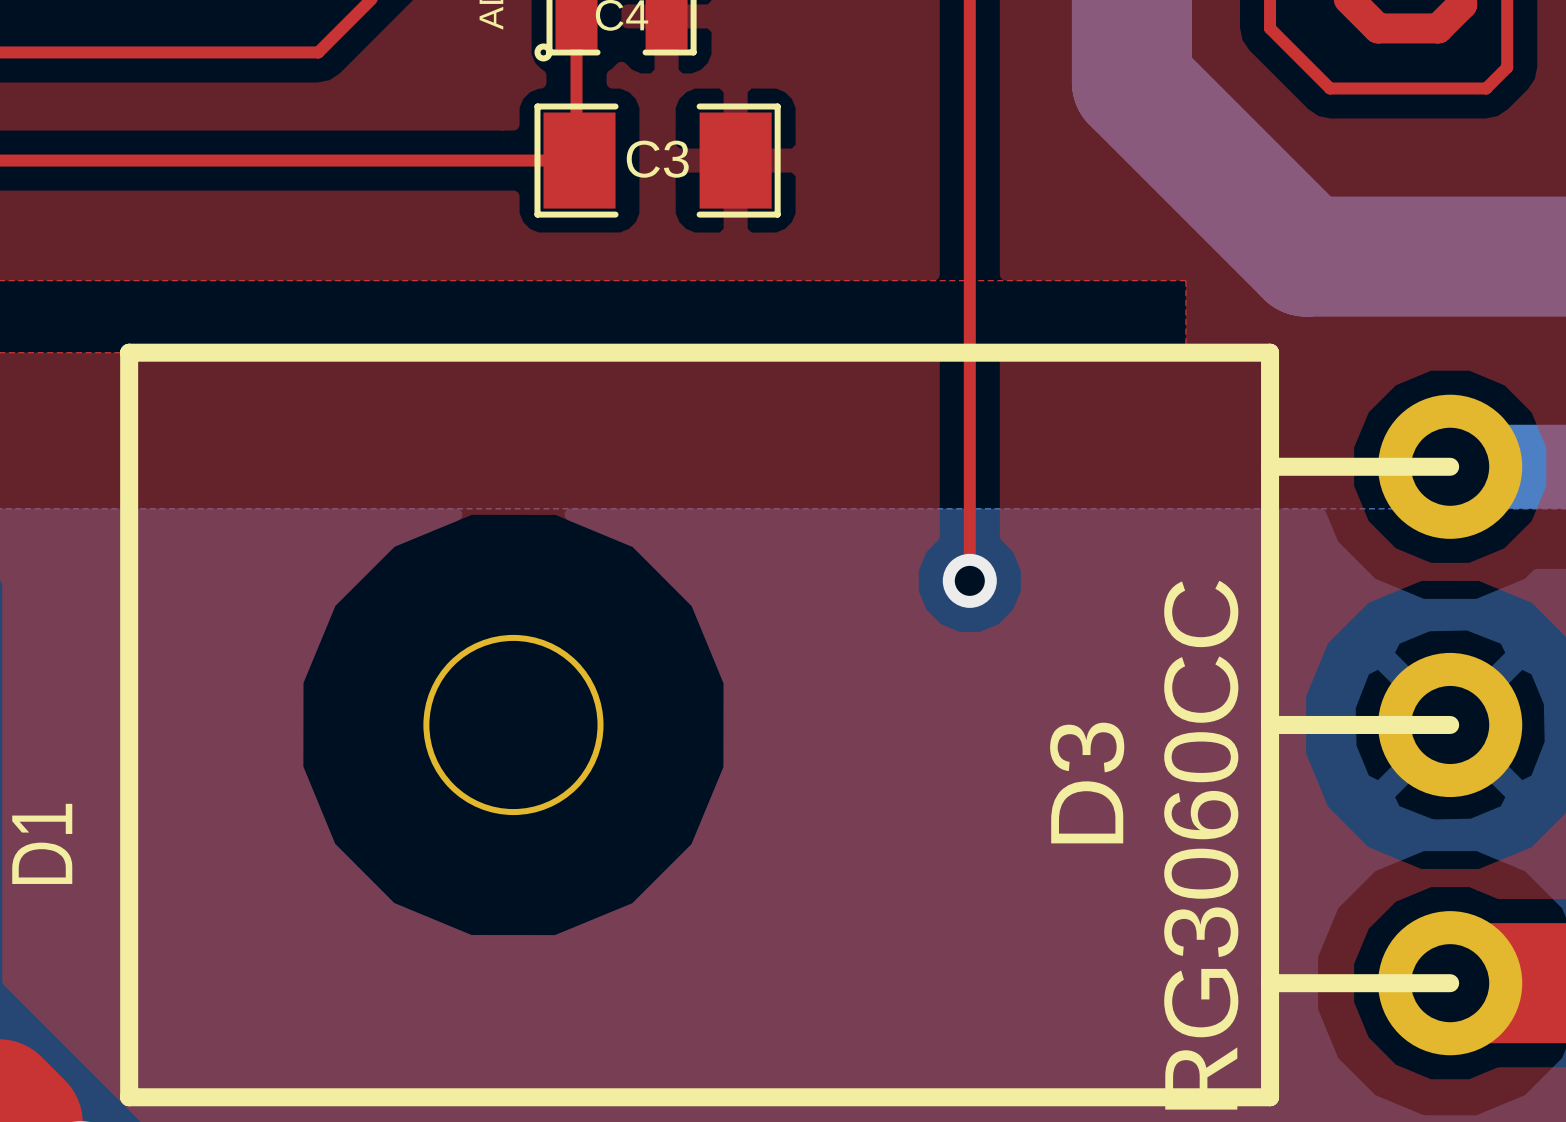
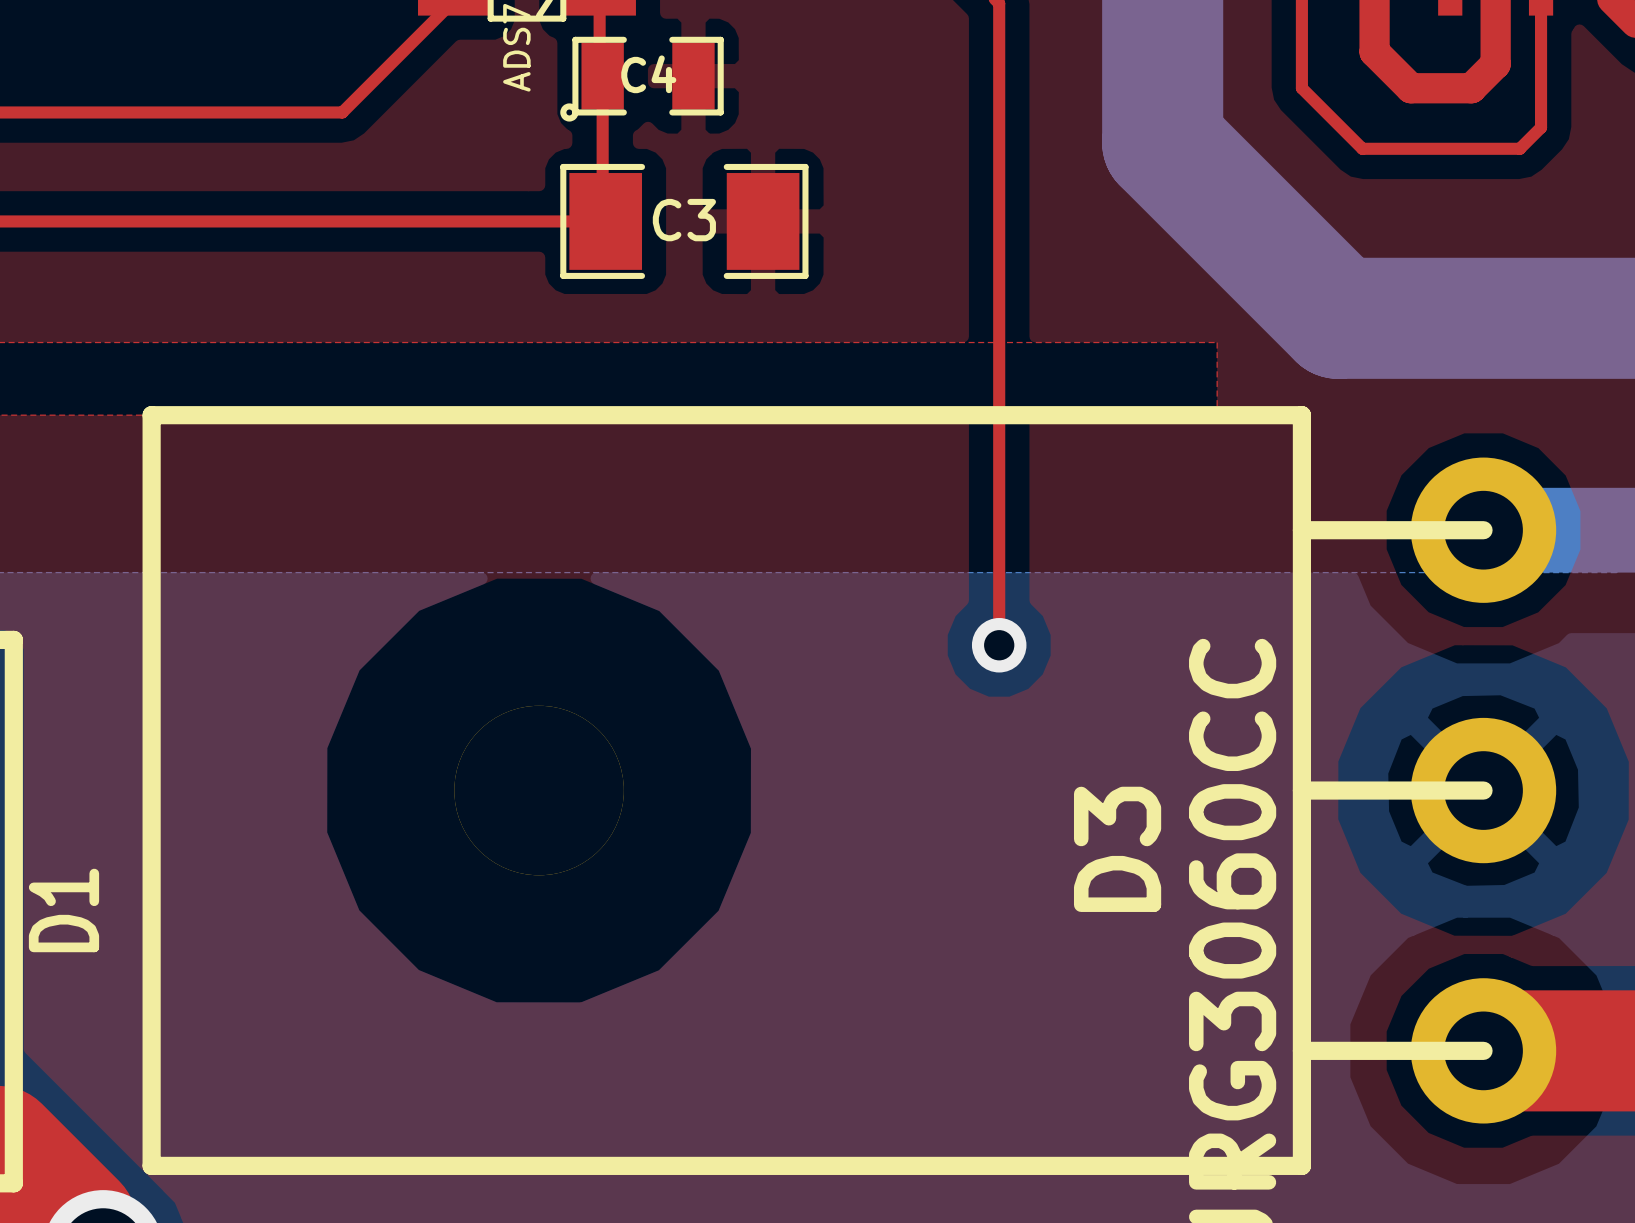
D3 footprint: [120, 343, 1523, 1107] -> [142, 406, 1557, 1175]

